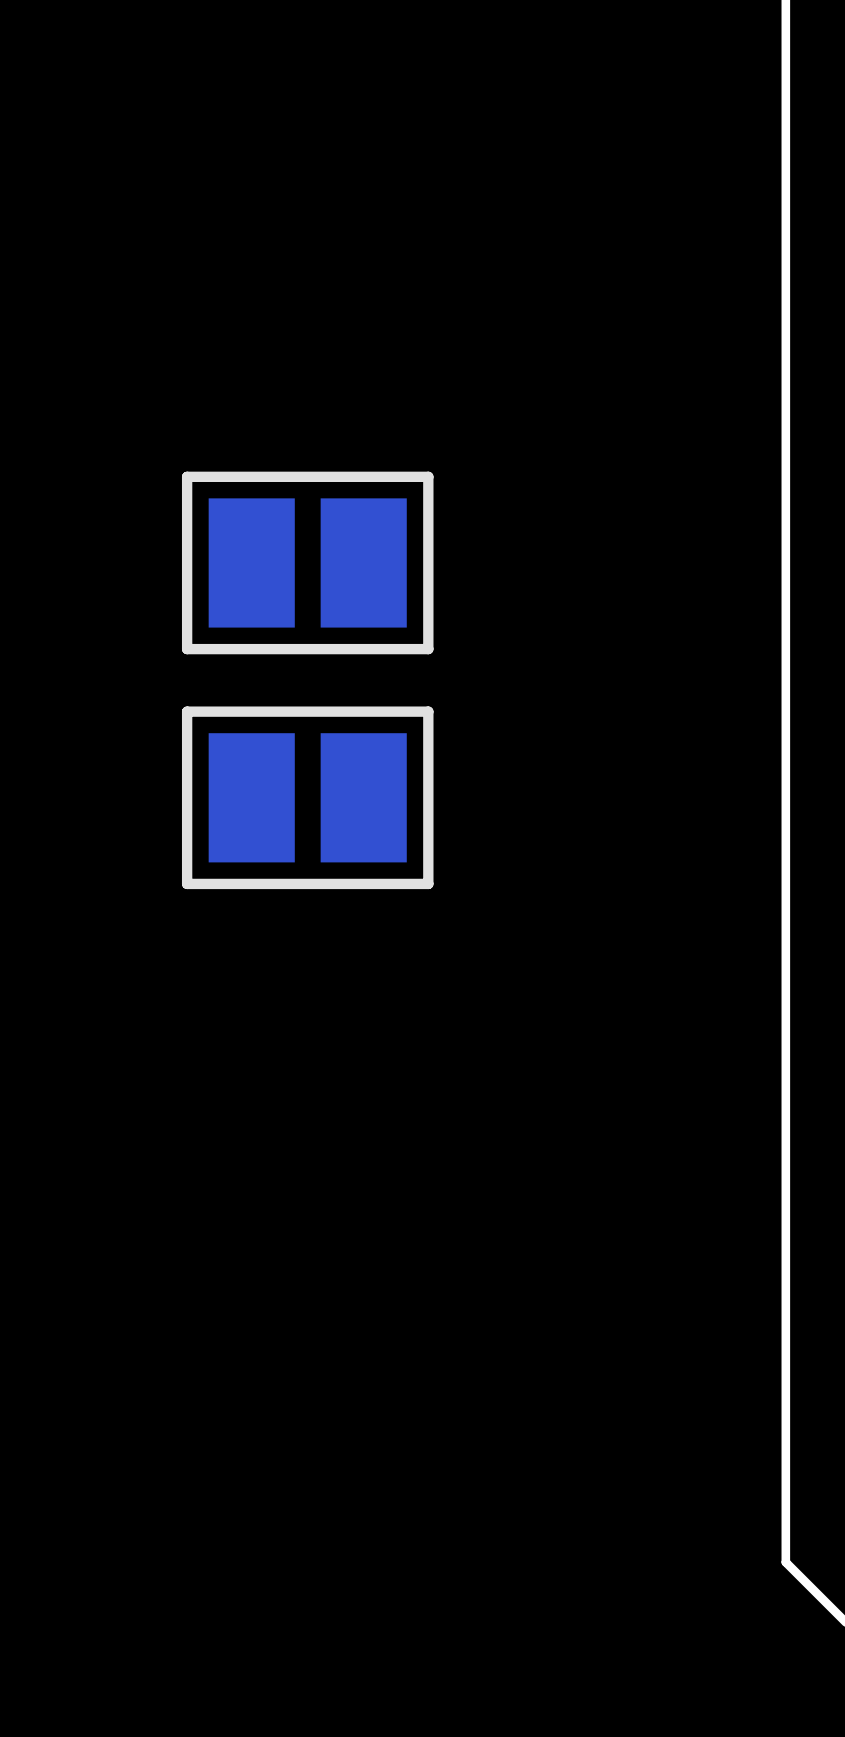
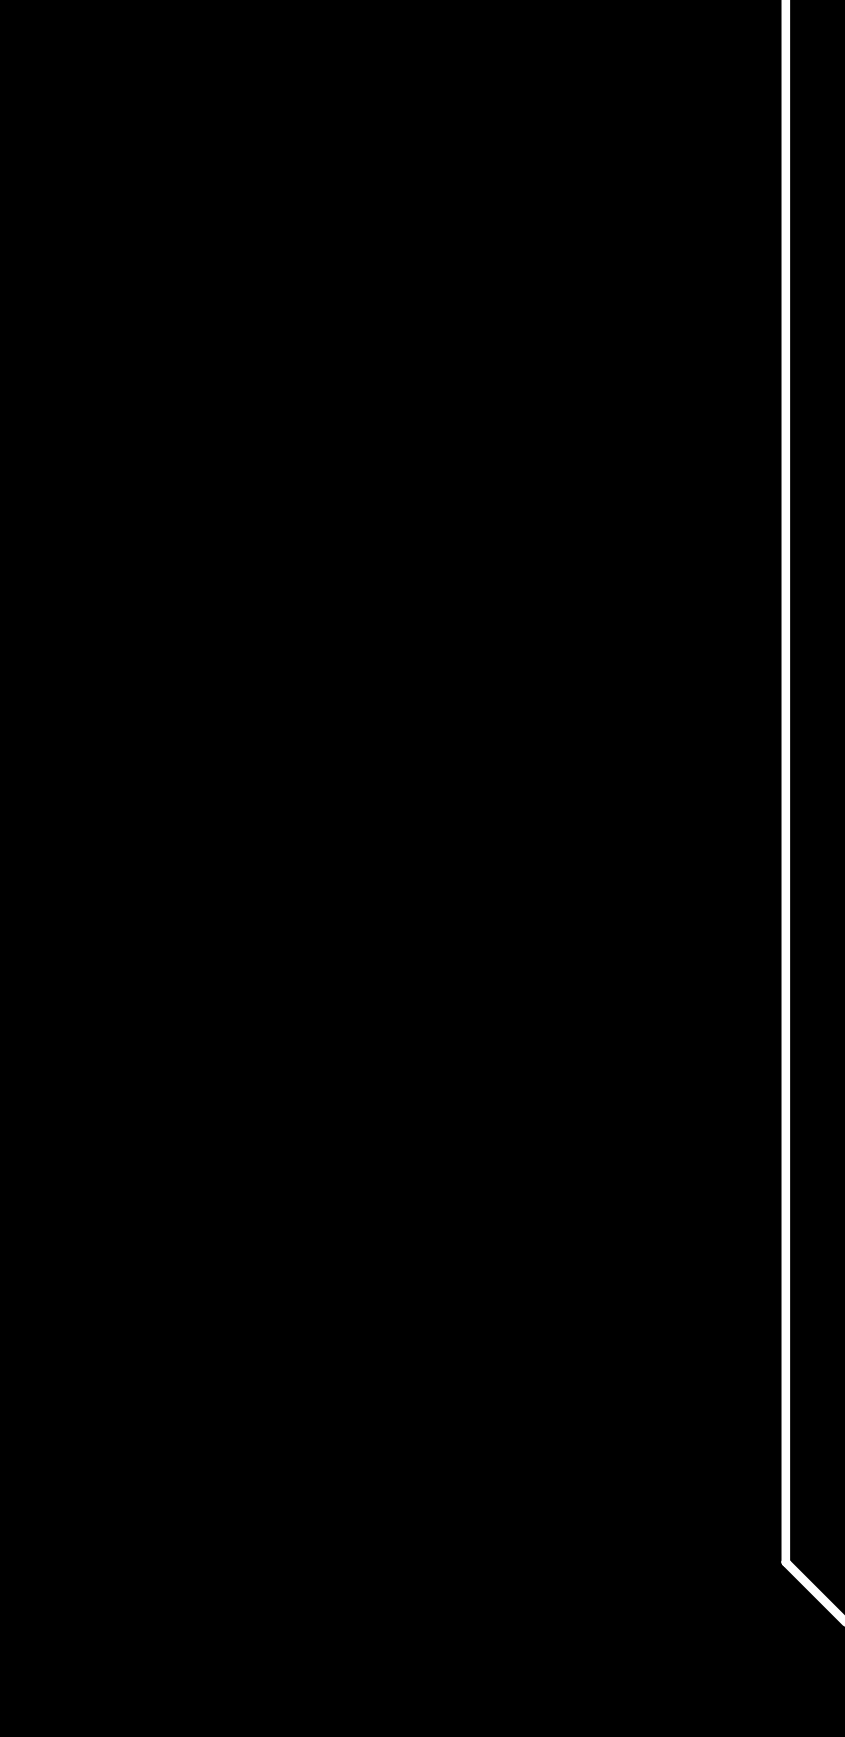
part: (307, 562) -> none
part: (307, 797) -> none

